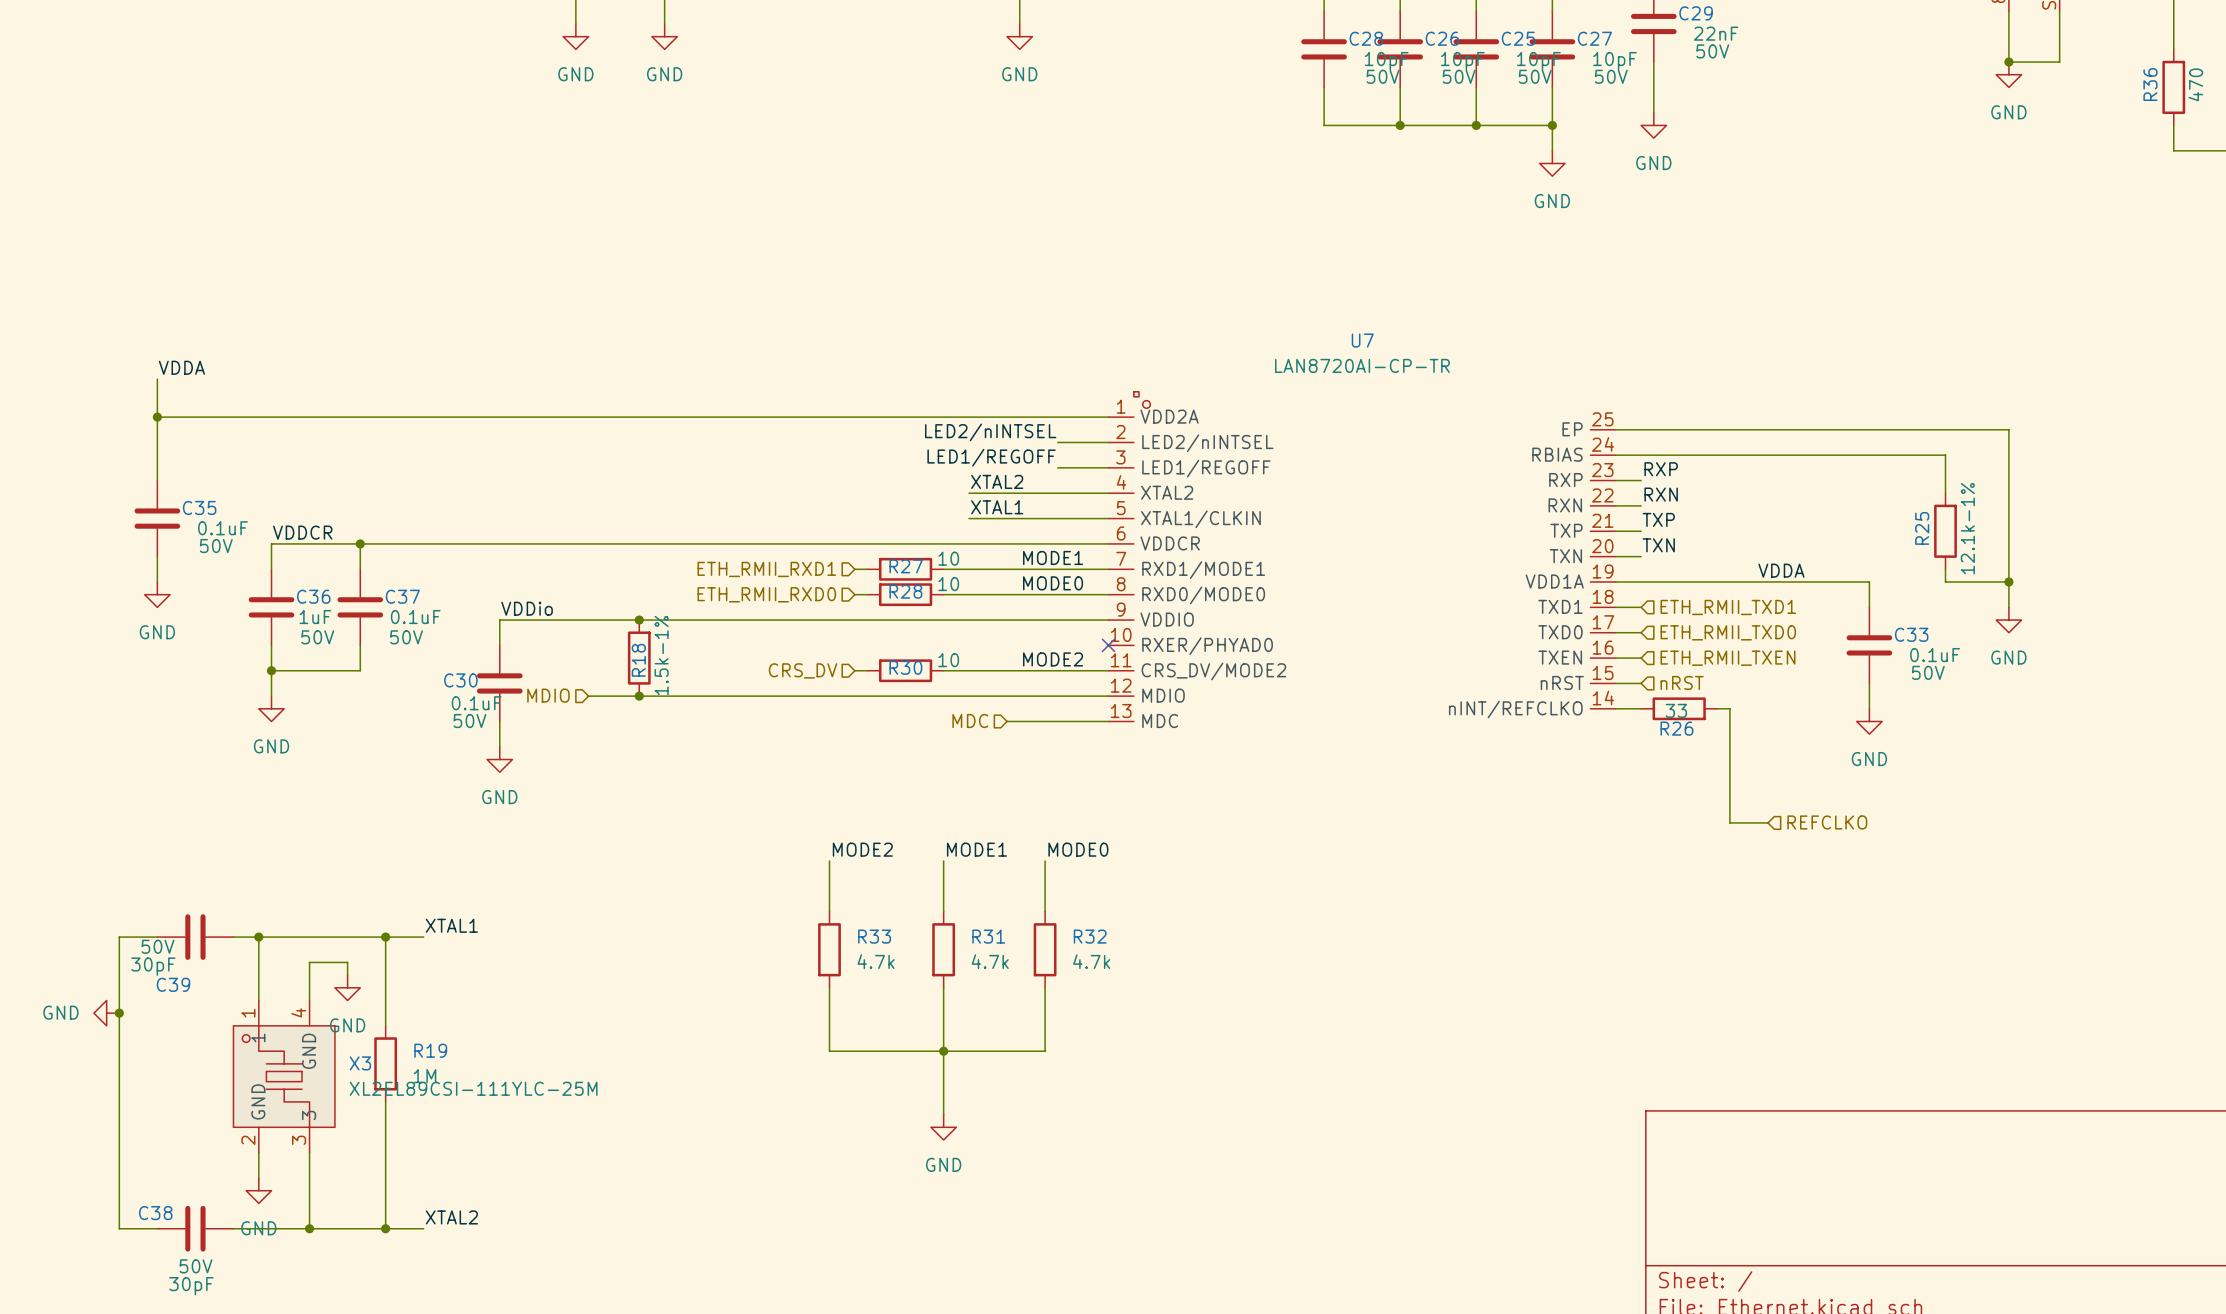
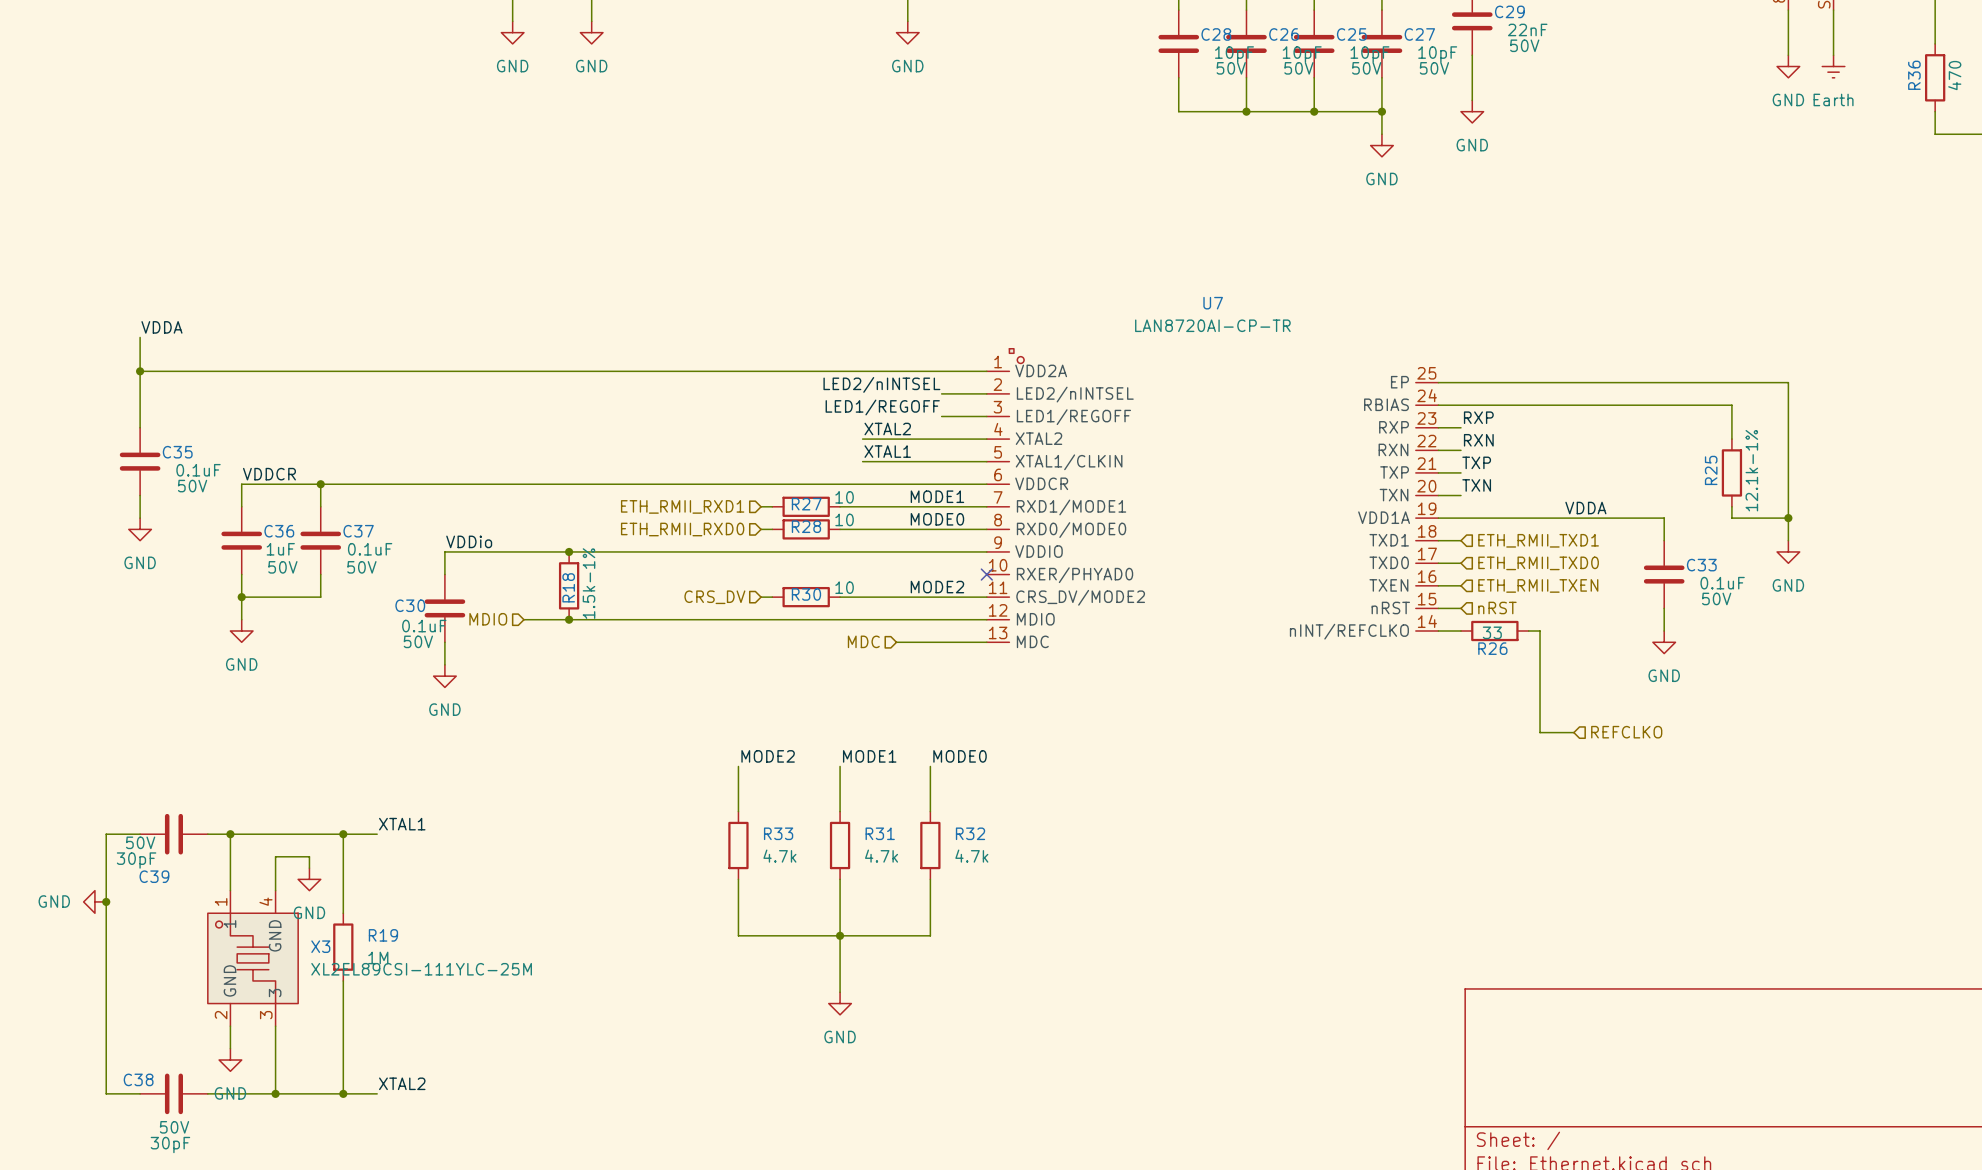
wire: (2008, 62) (2059, 62) -> none
junction: (2008, 62) -> none
power symbol: none -> Earth (1833, 66)

